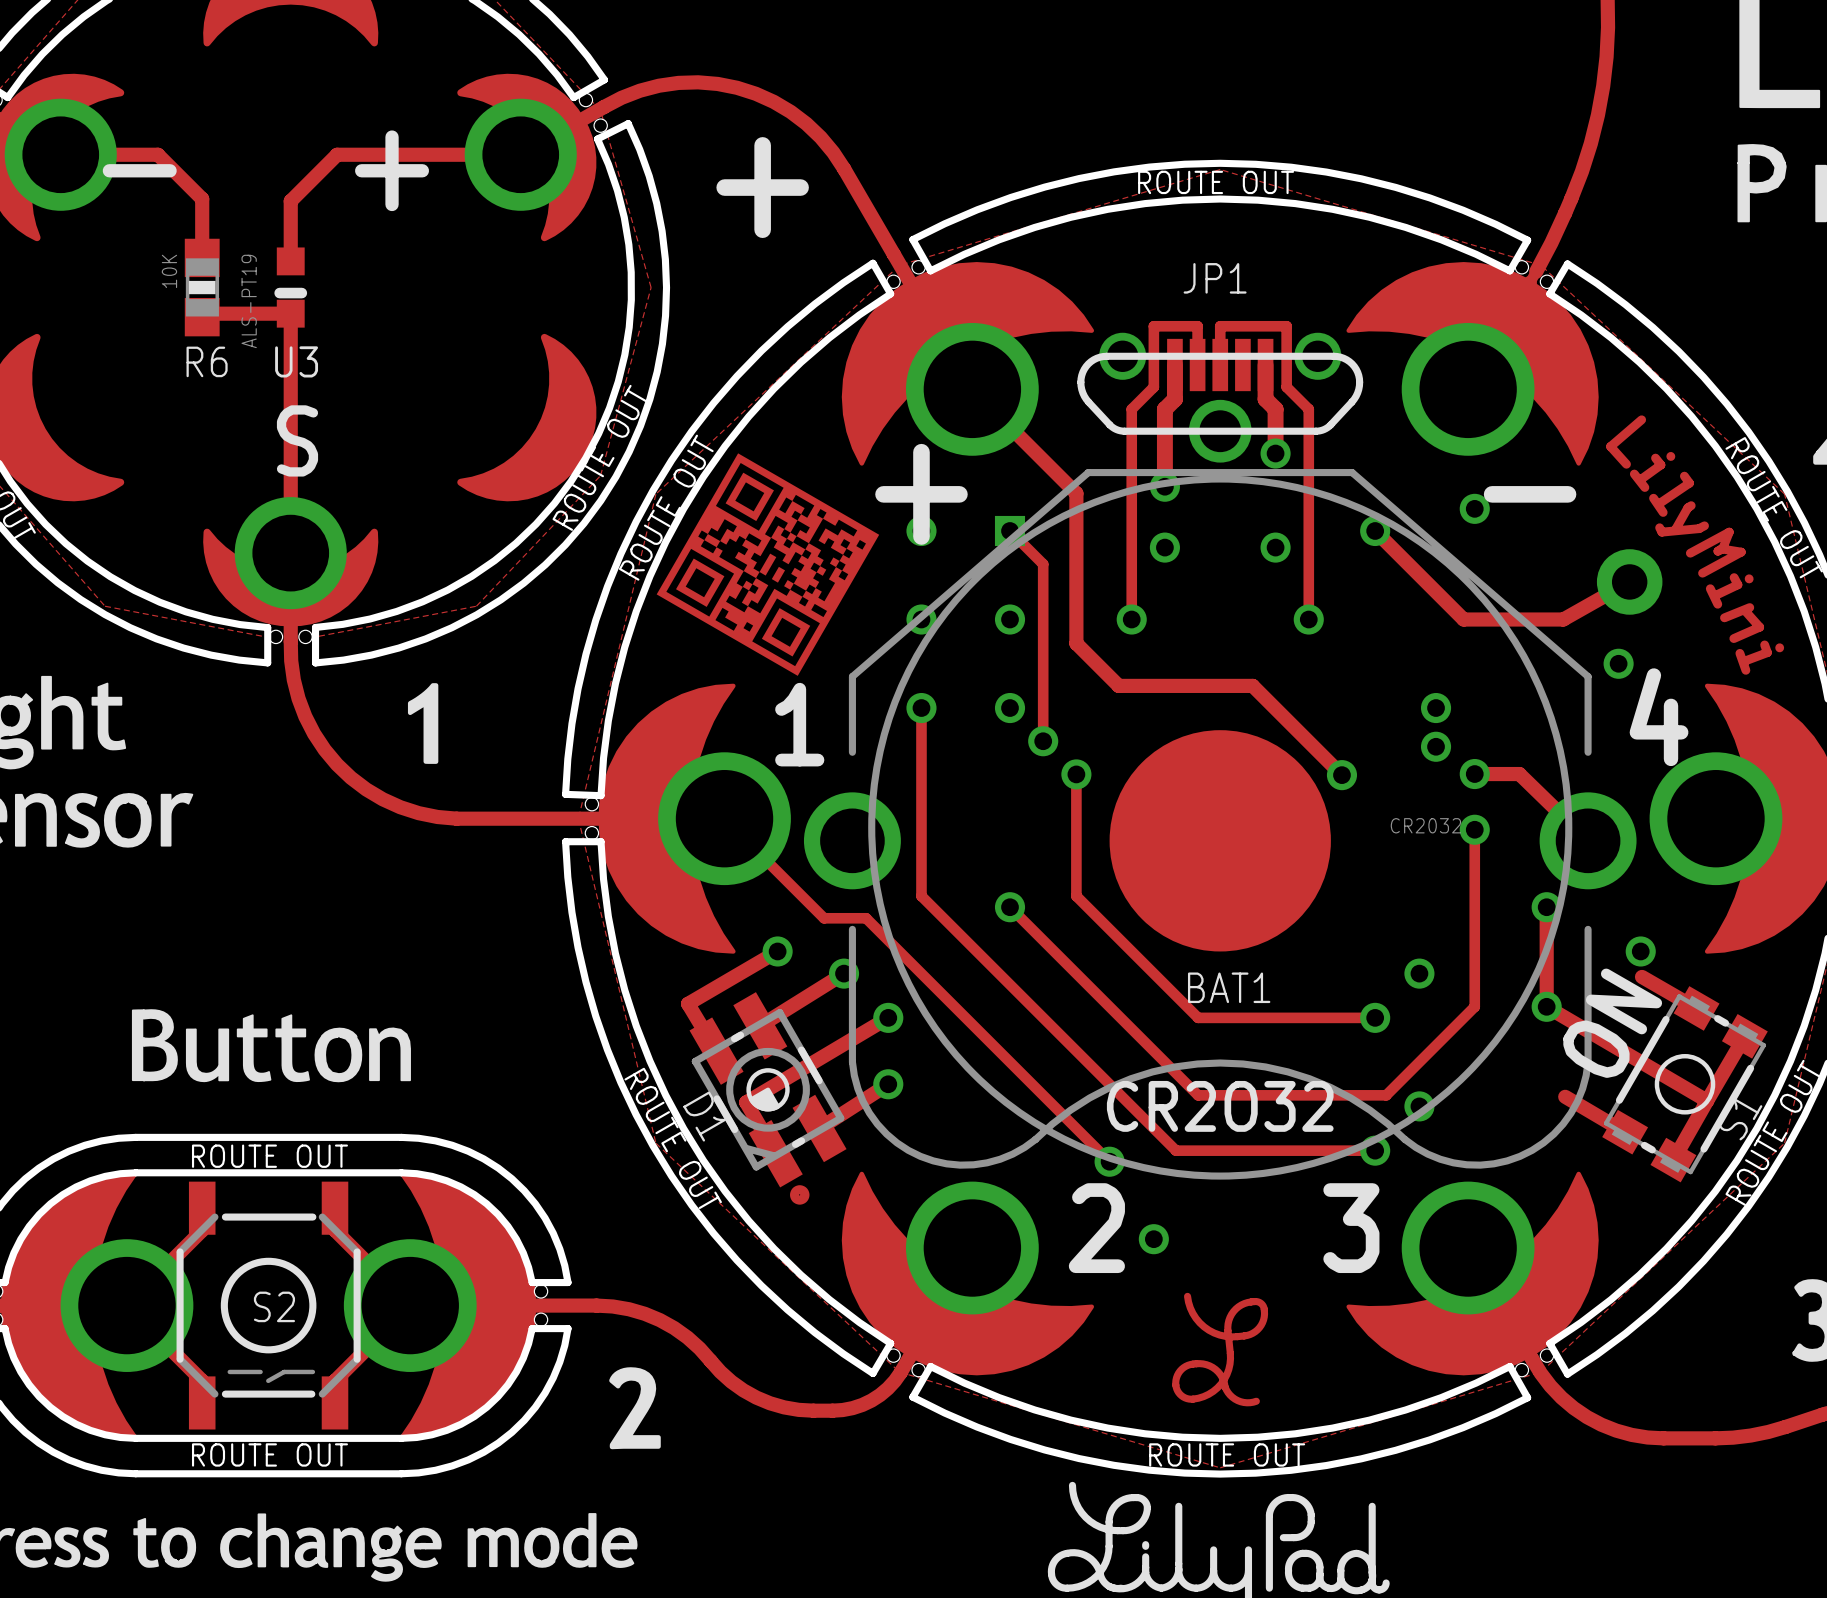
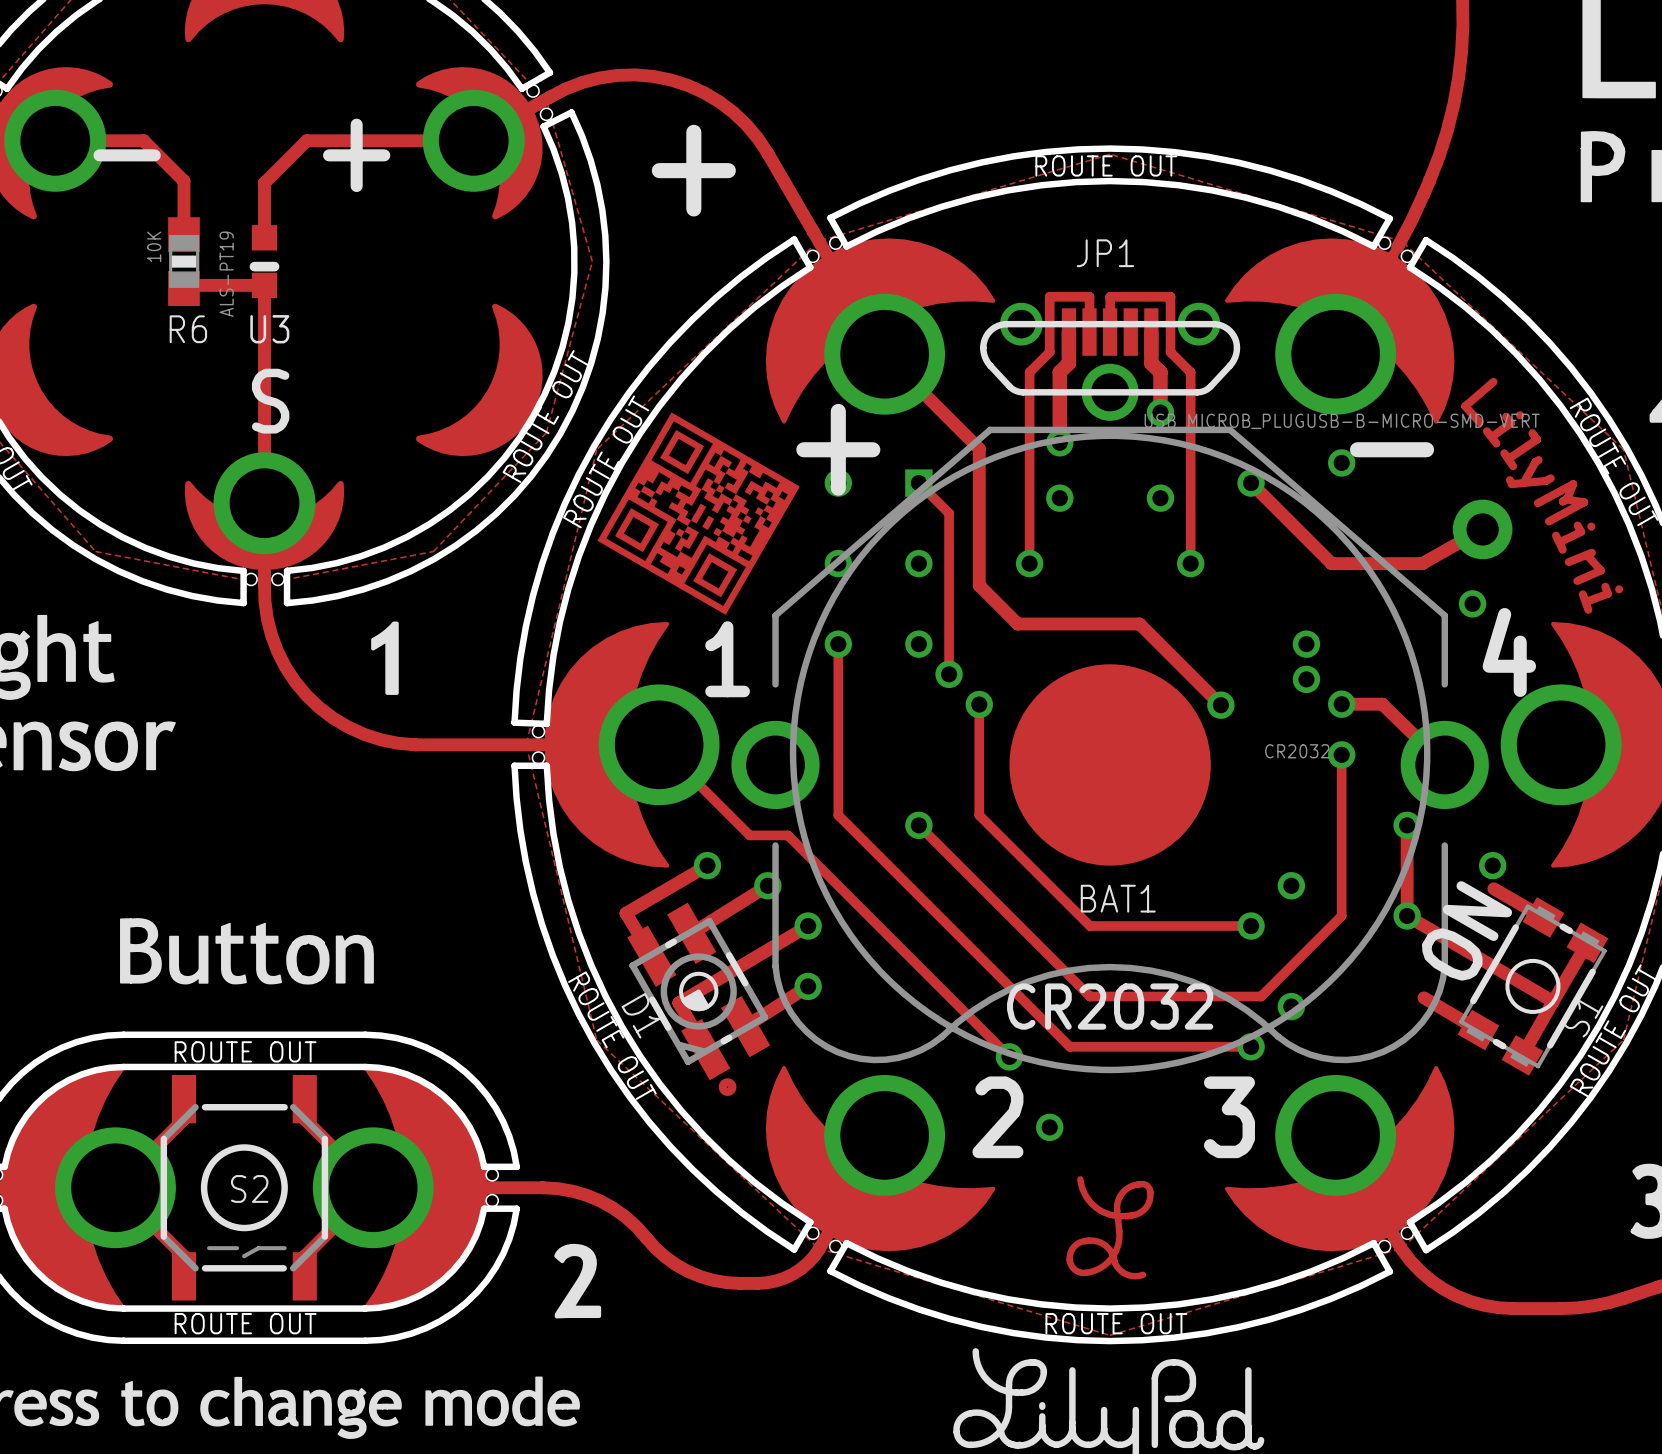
JP1 value: none -> USB_MICROB_PLUGUSB-B-MICRO-SMD-VERT (1342, 421)

